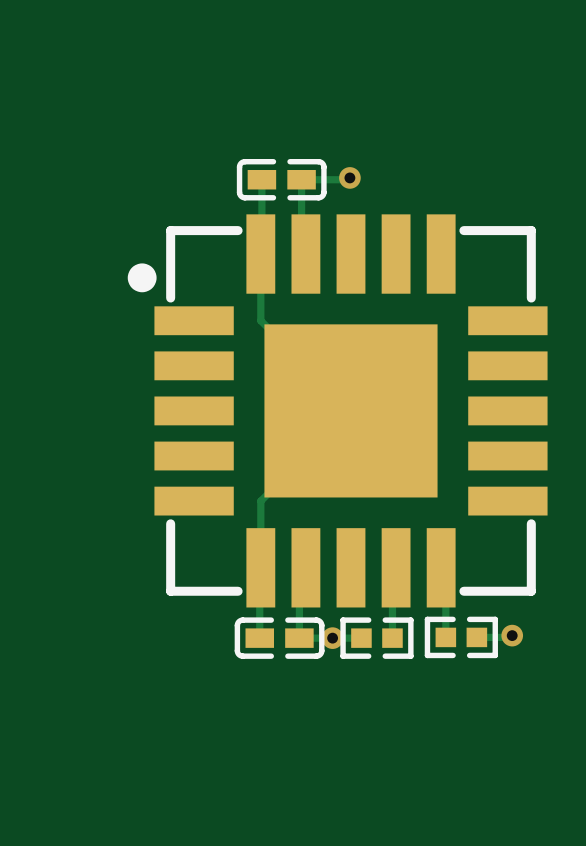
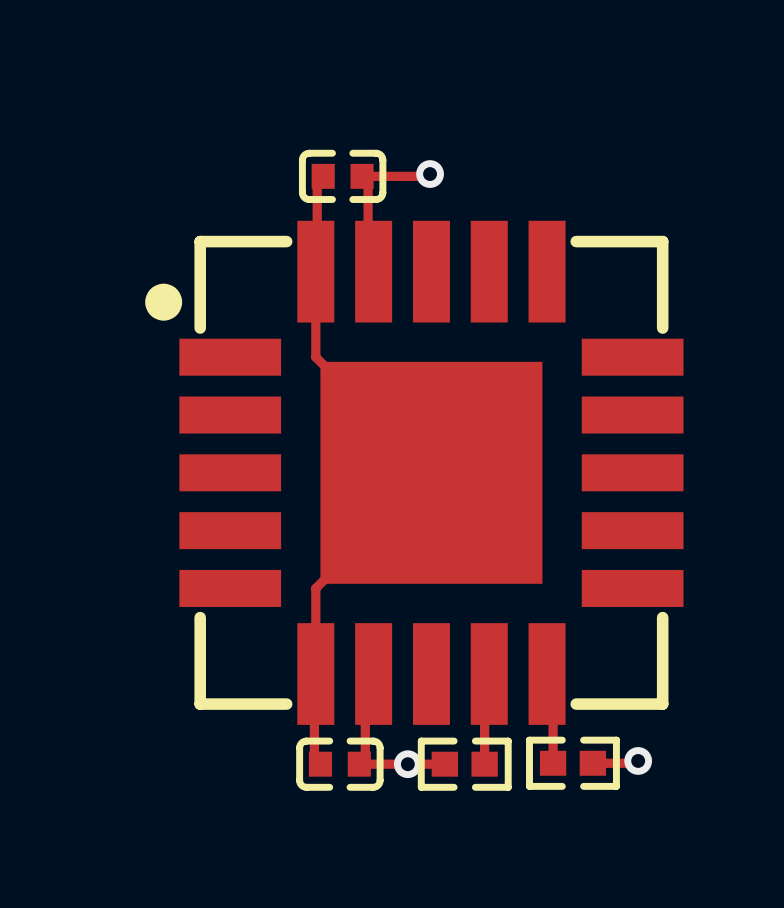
part footprint: [236, 158, 327, 201] -> [298, 149, 387, 203]
part footprint: [234, 617, 325, 659] -> [296, 737, 384, 791]

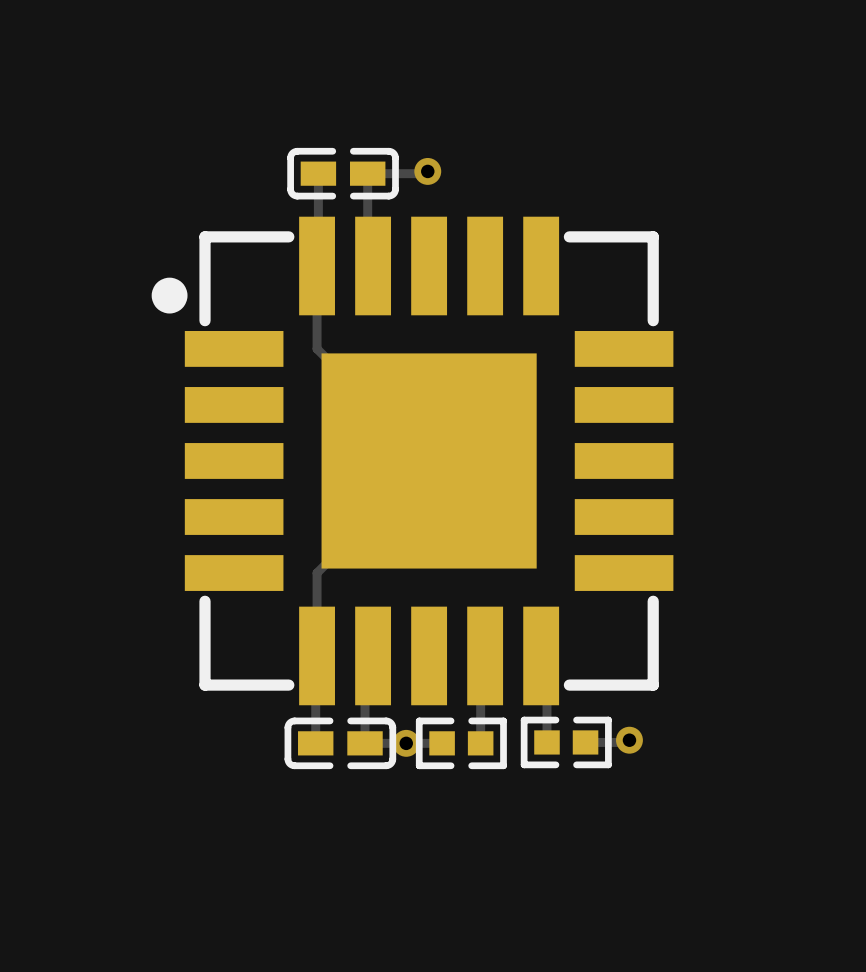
part footprint: [298, 149, 387, 203] -> [287, 147, 399, 200]
part footprint: [296, 737, 384, 791] -> [284, 717, 397, 770]

